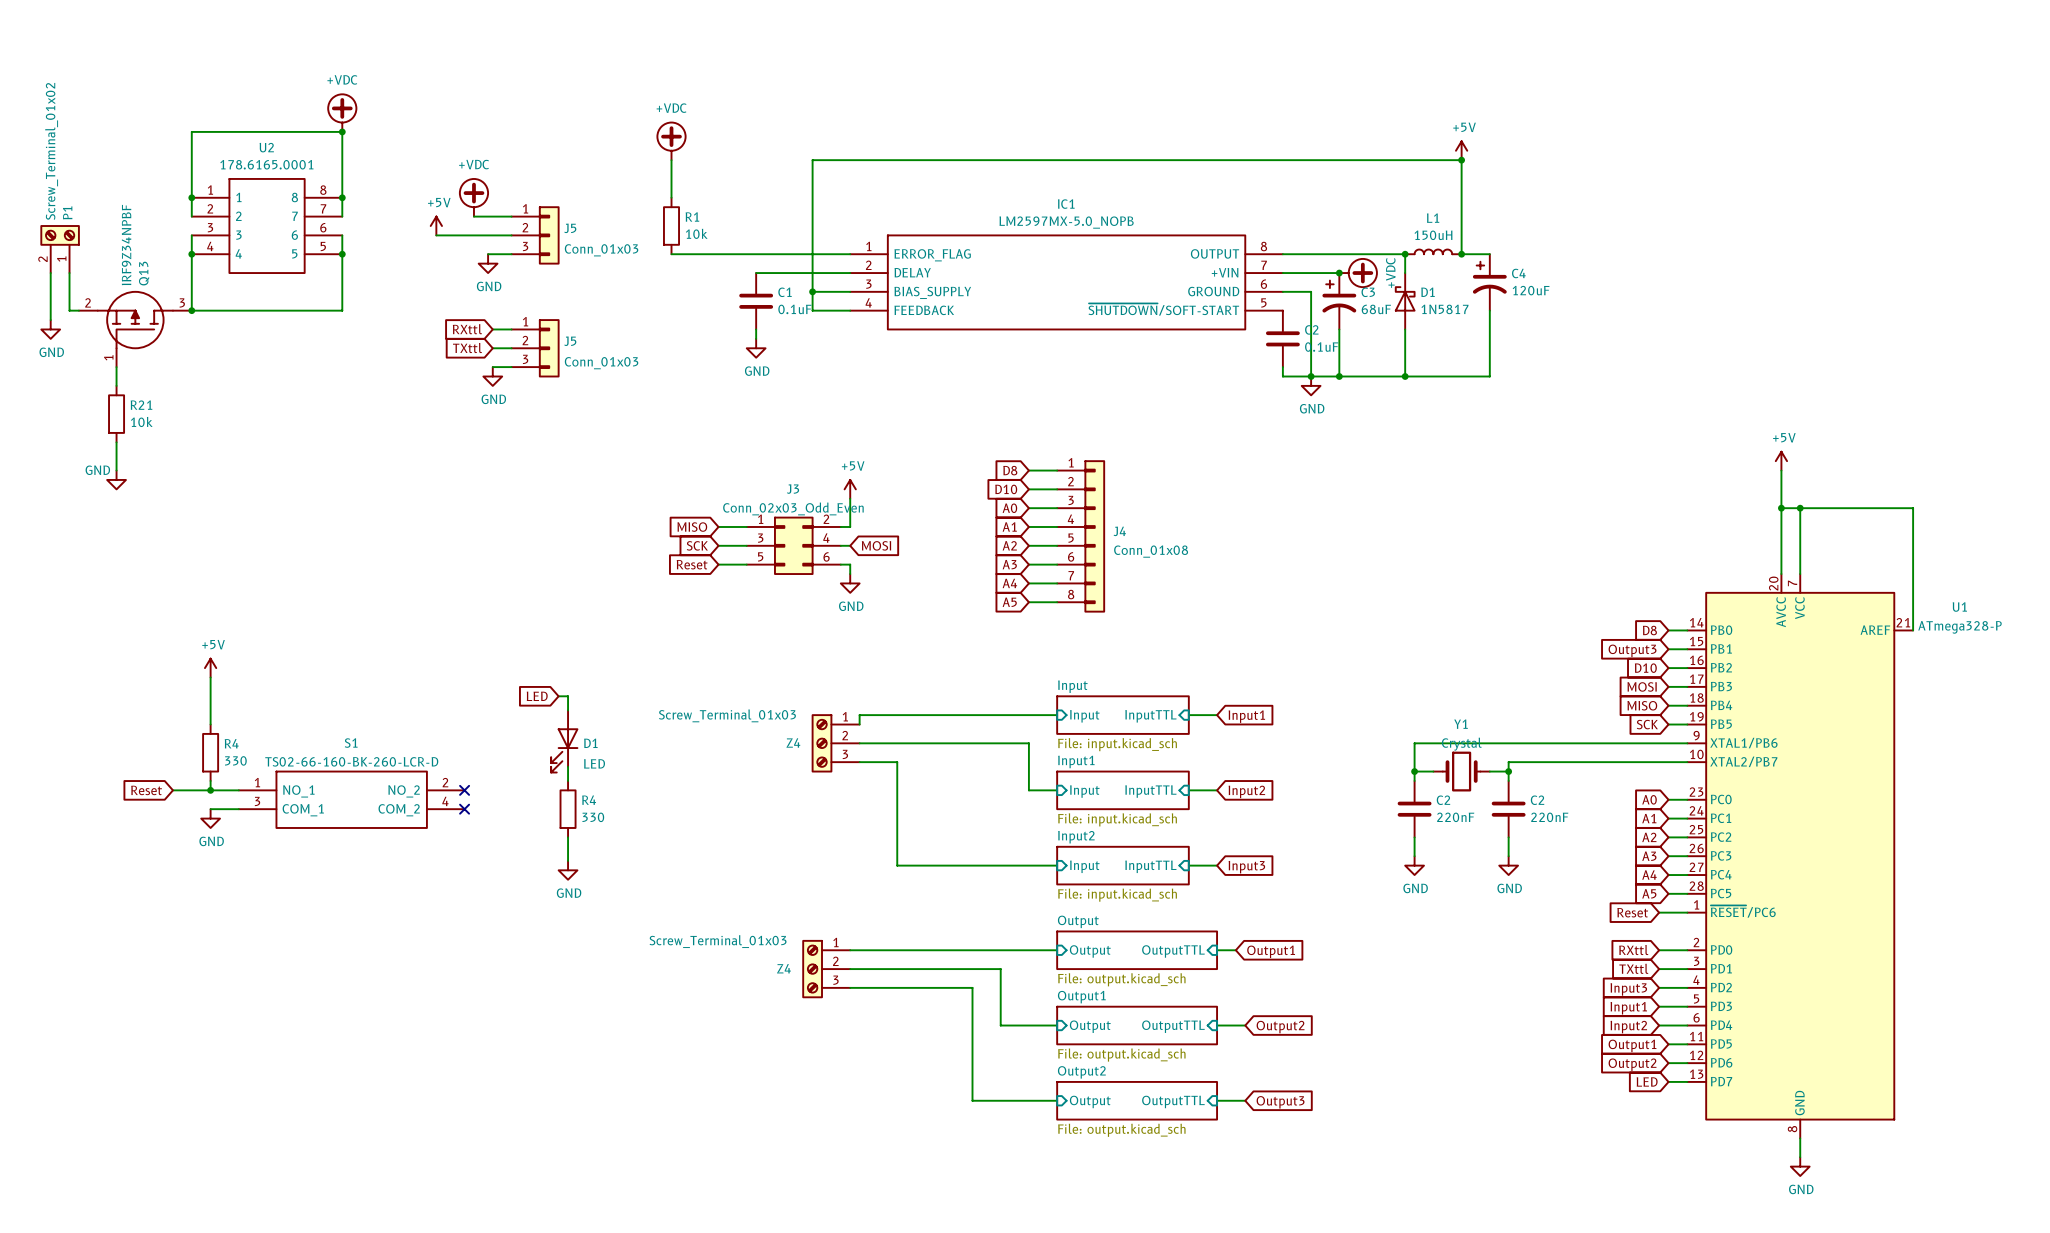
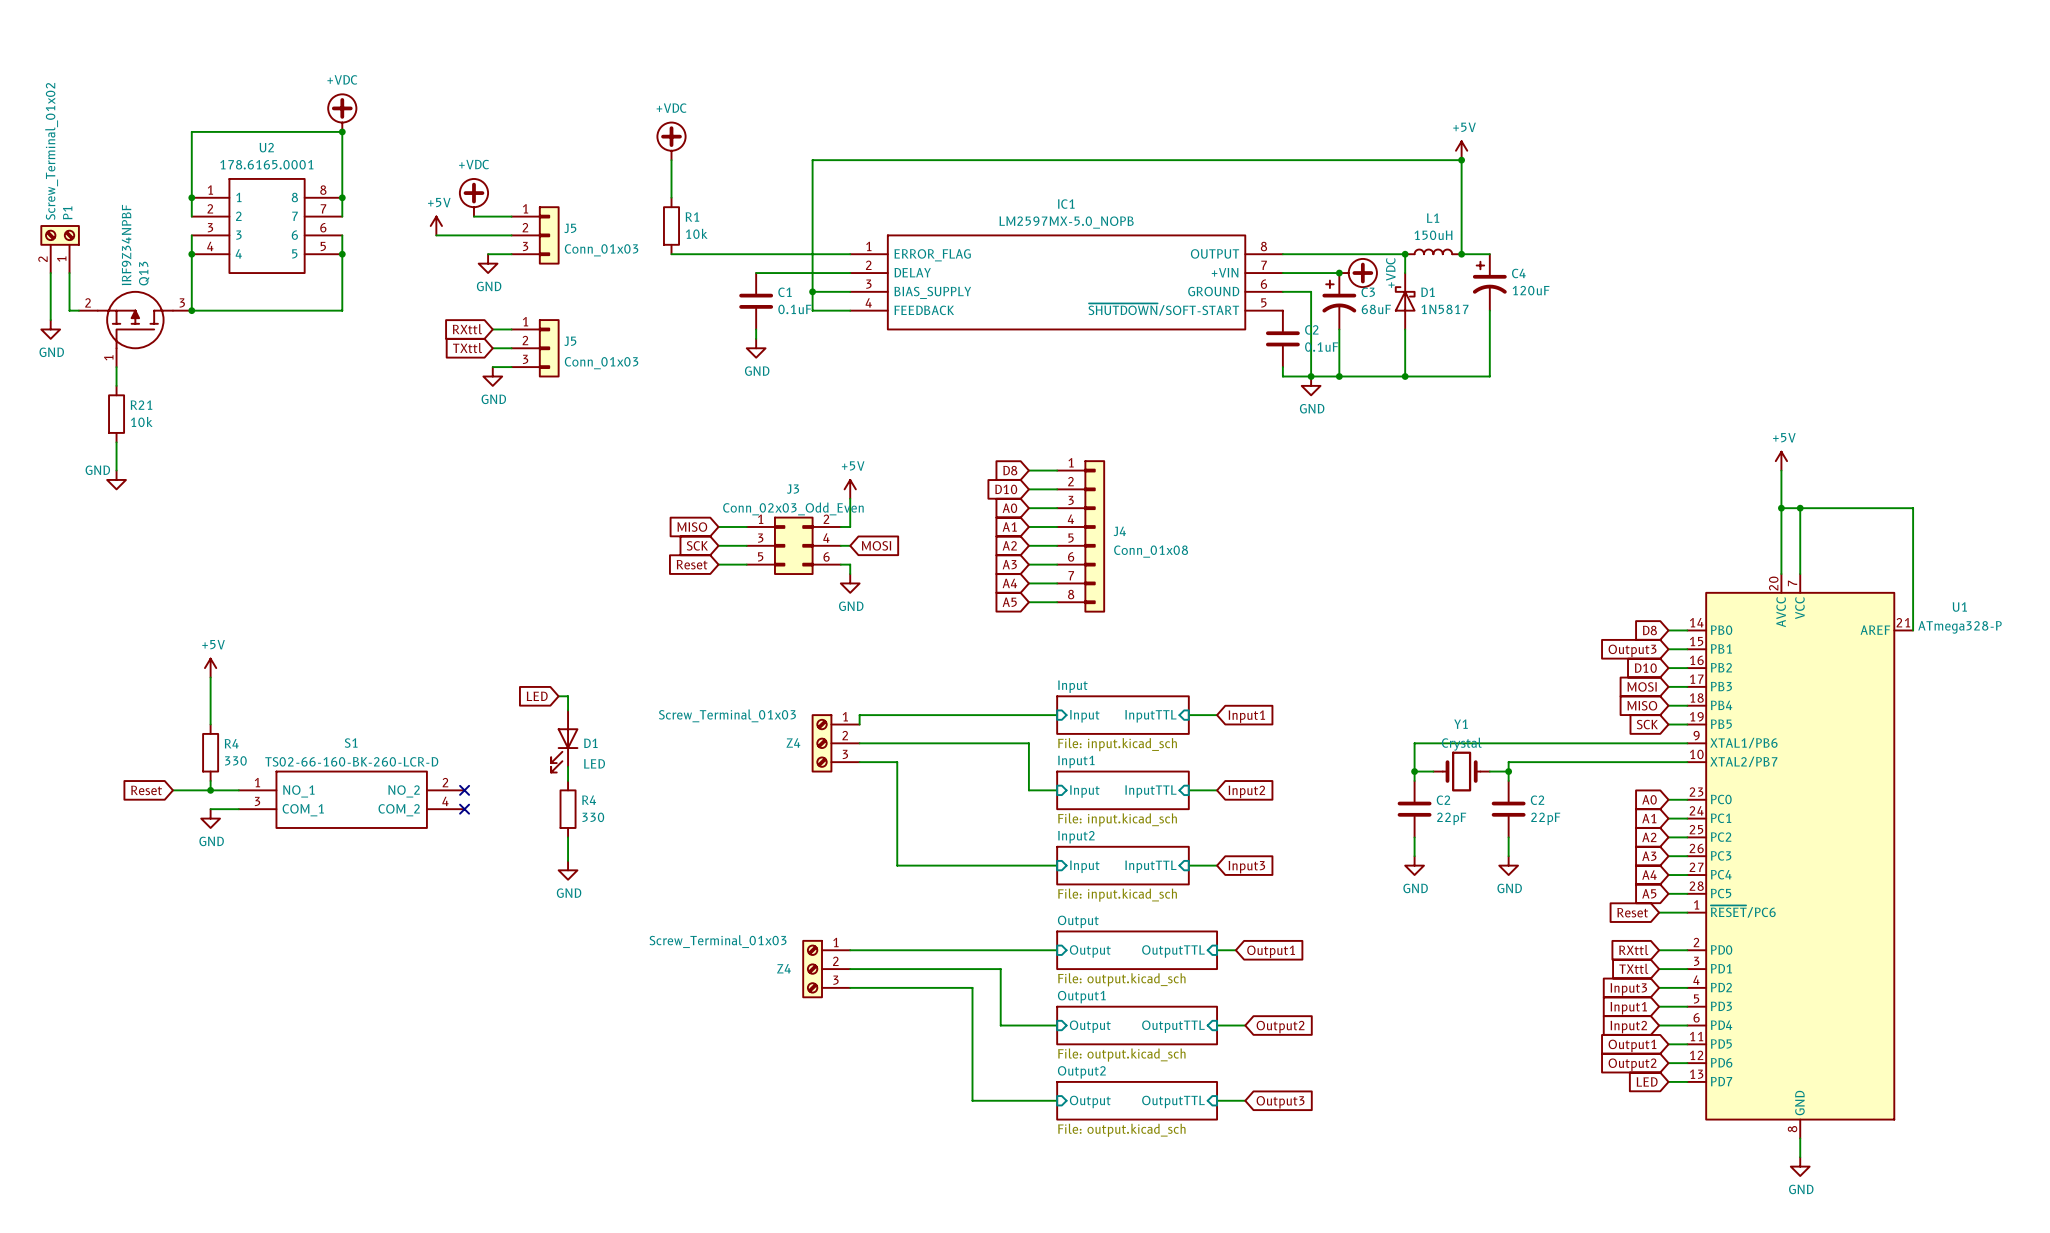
C2 value: 220nF (1455, 817) -> 22pF (1451, 818)
C2 value: 220nF (1549, 817) -> 22pF (1545, 818)

